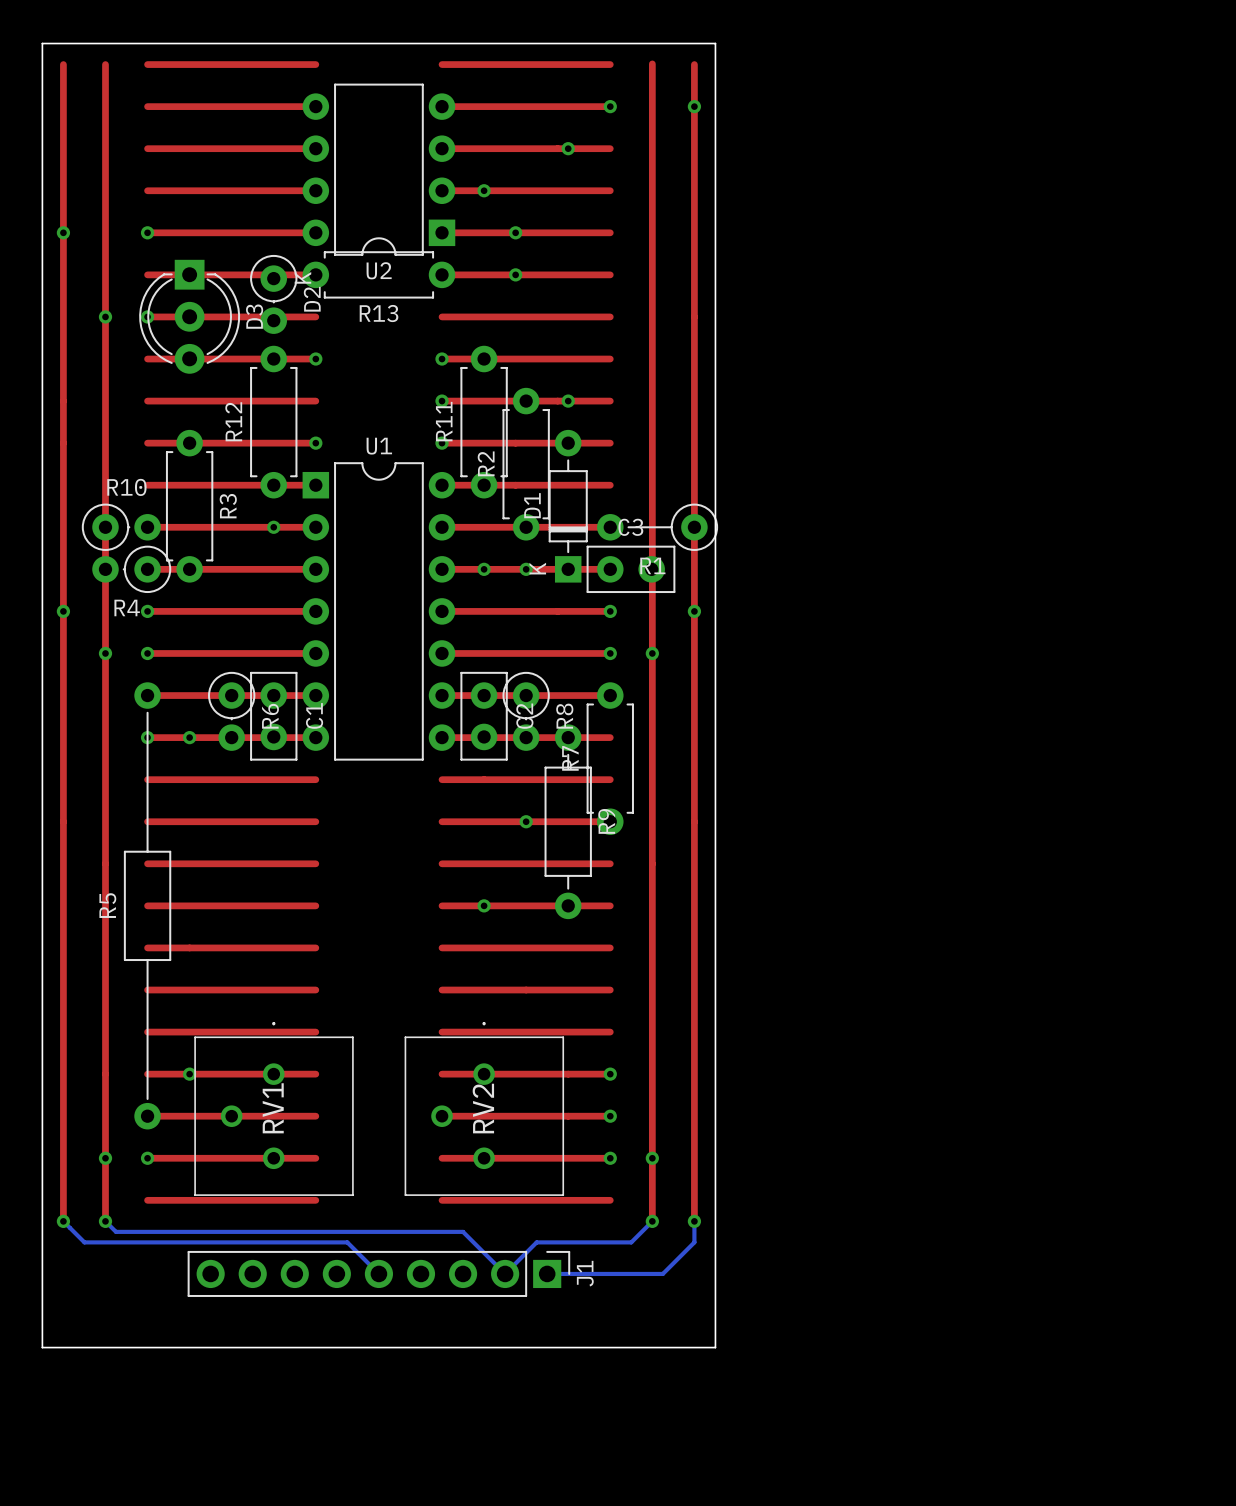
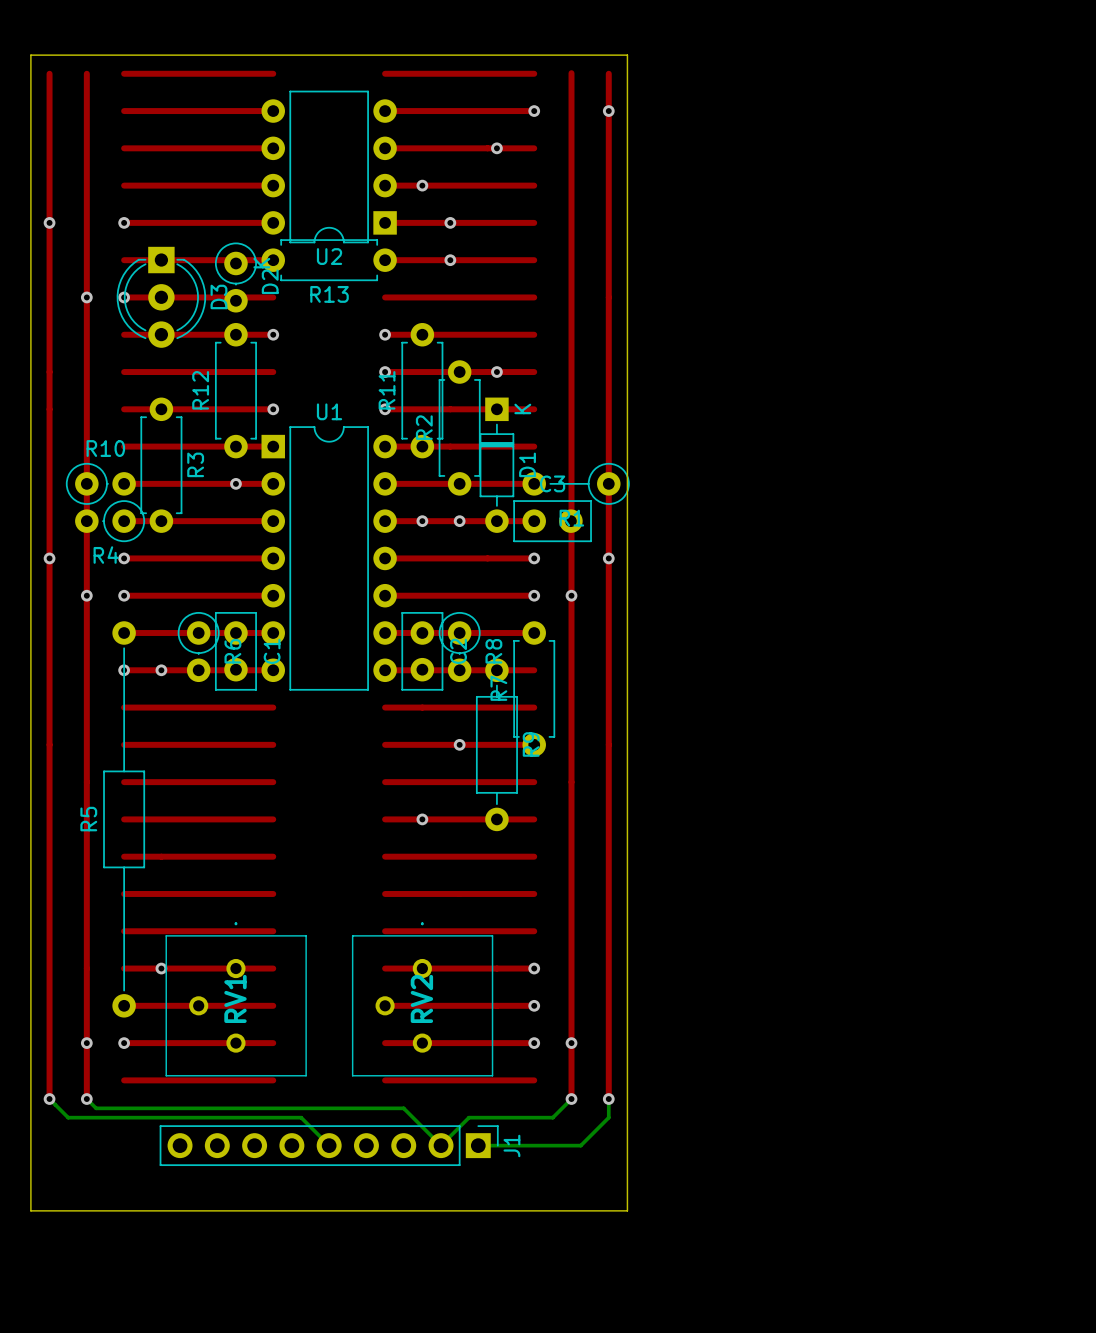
D1 rotation: 0° (568, 506) -> 180° (496, 465)

